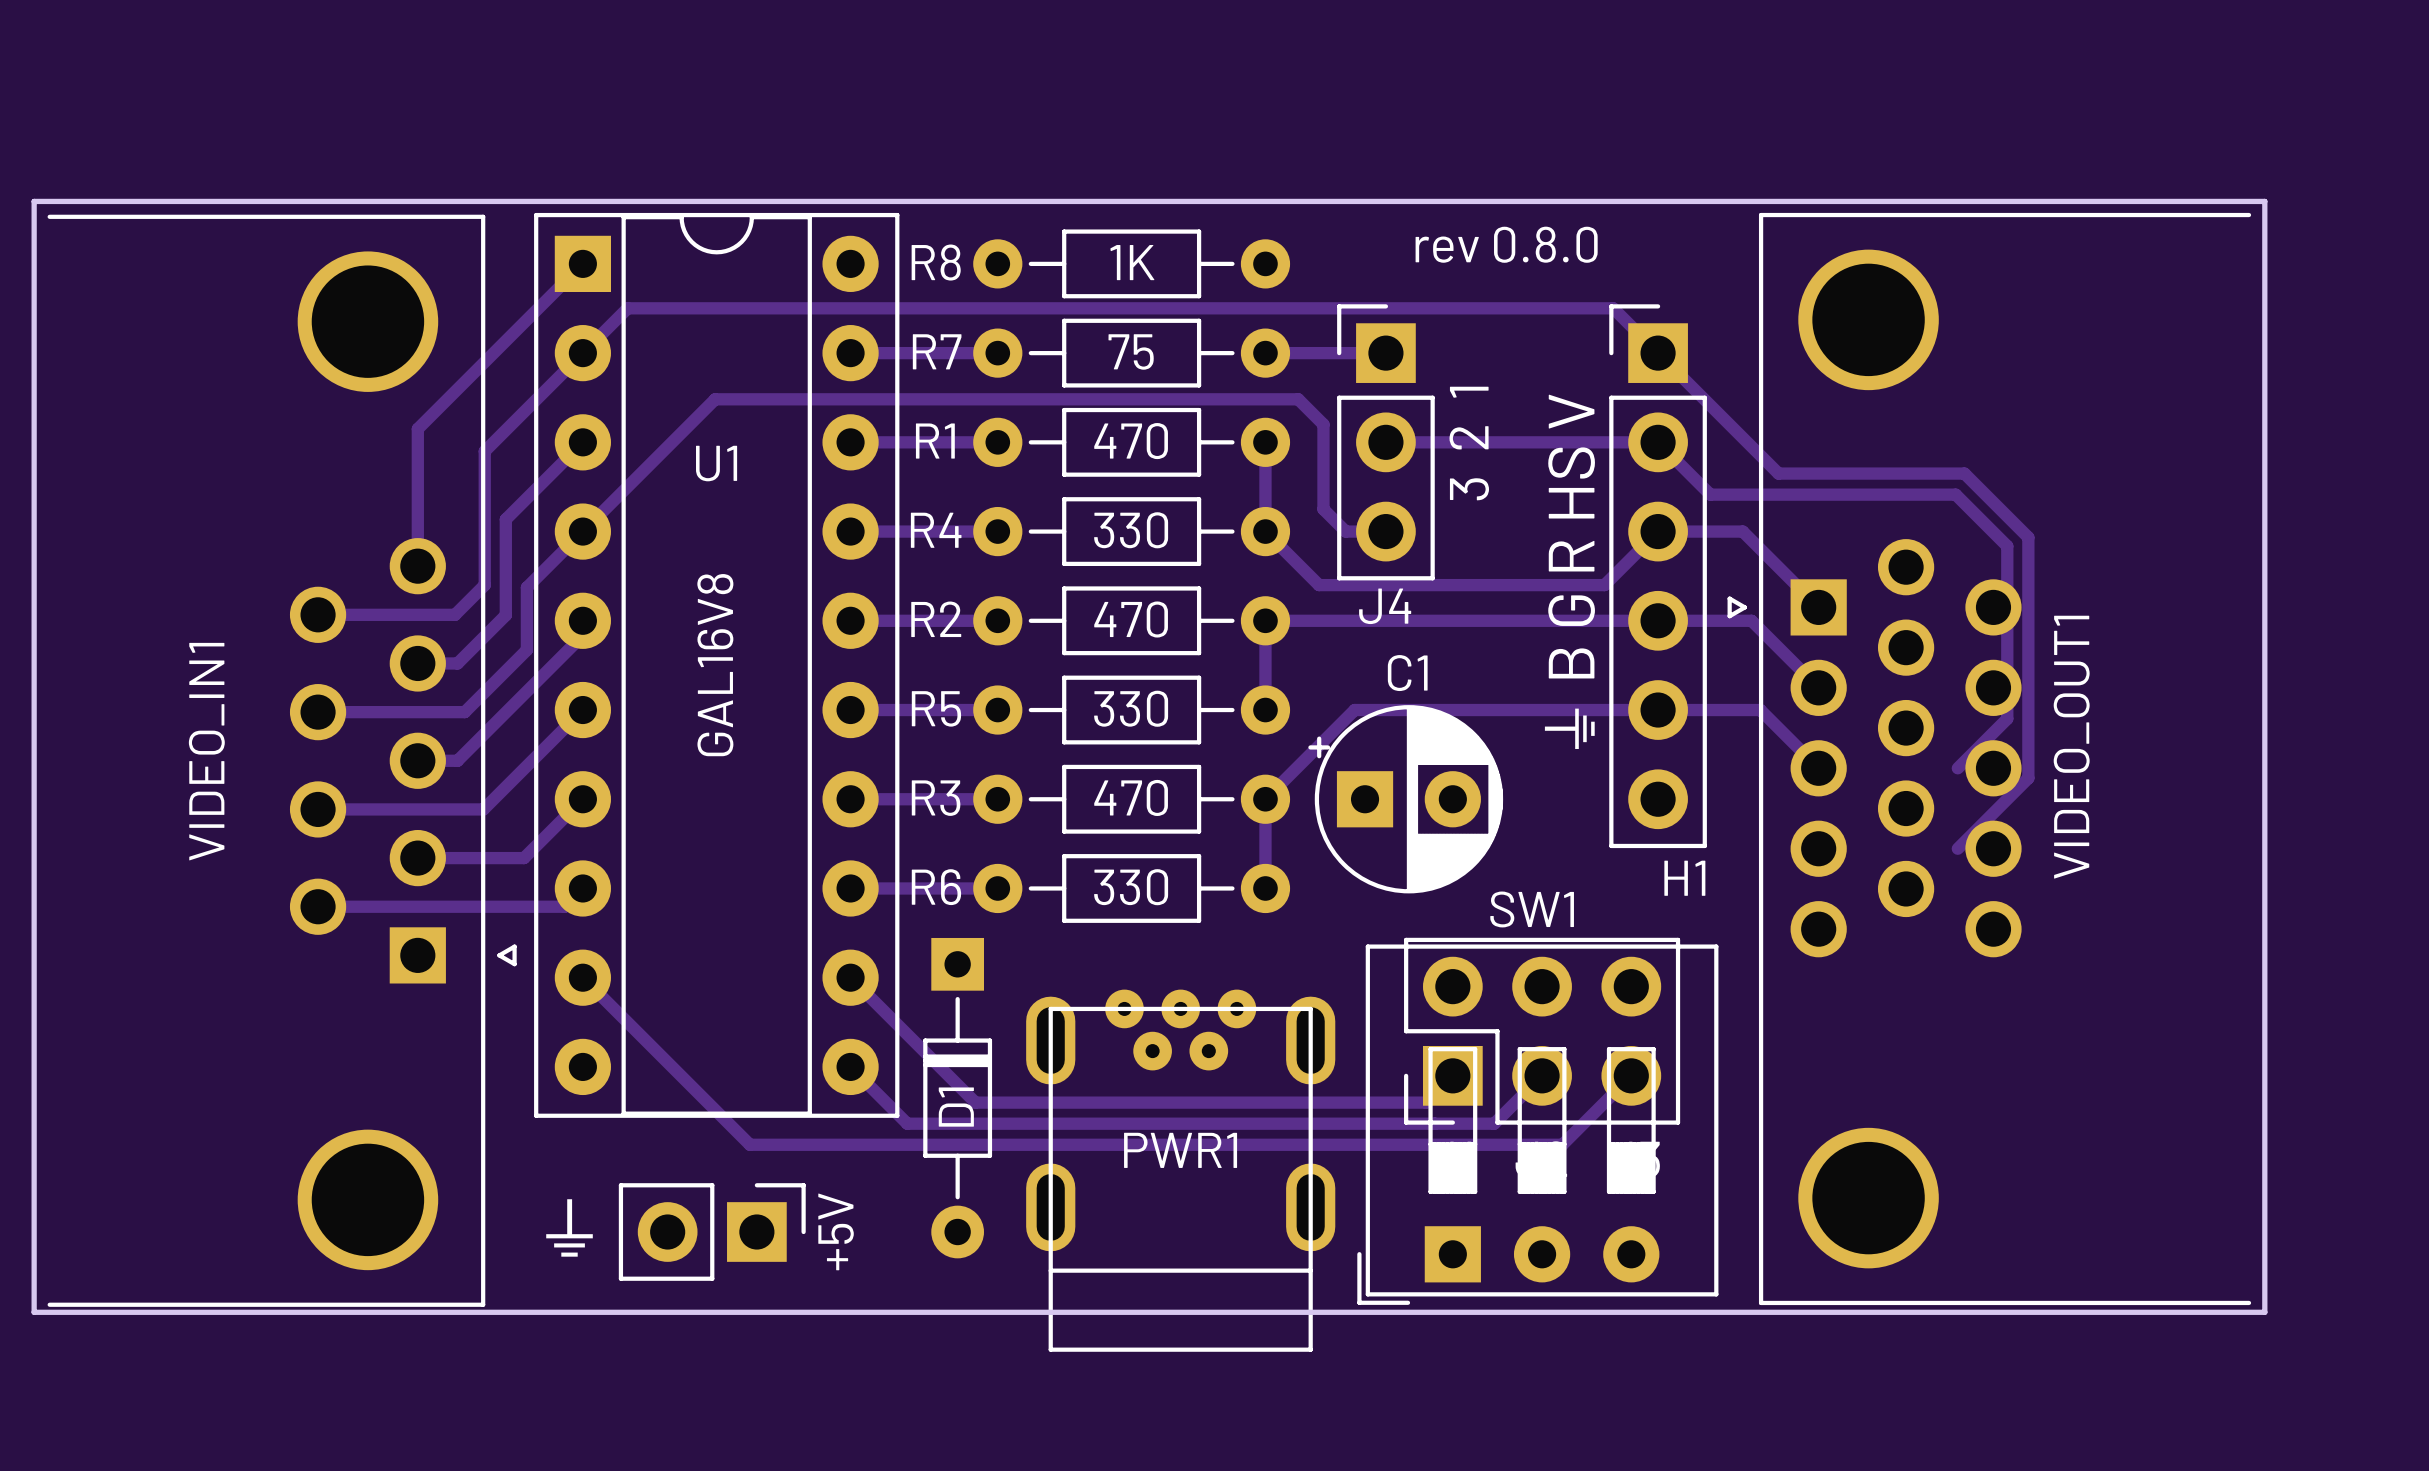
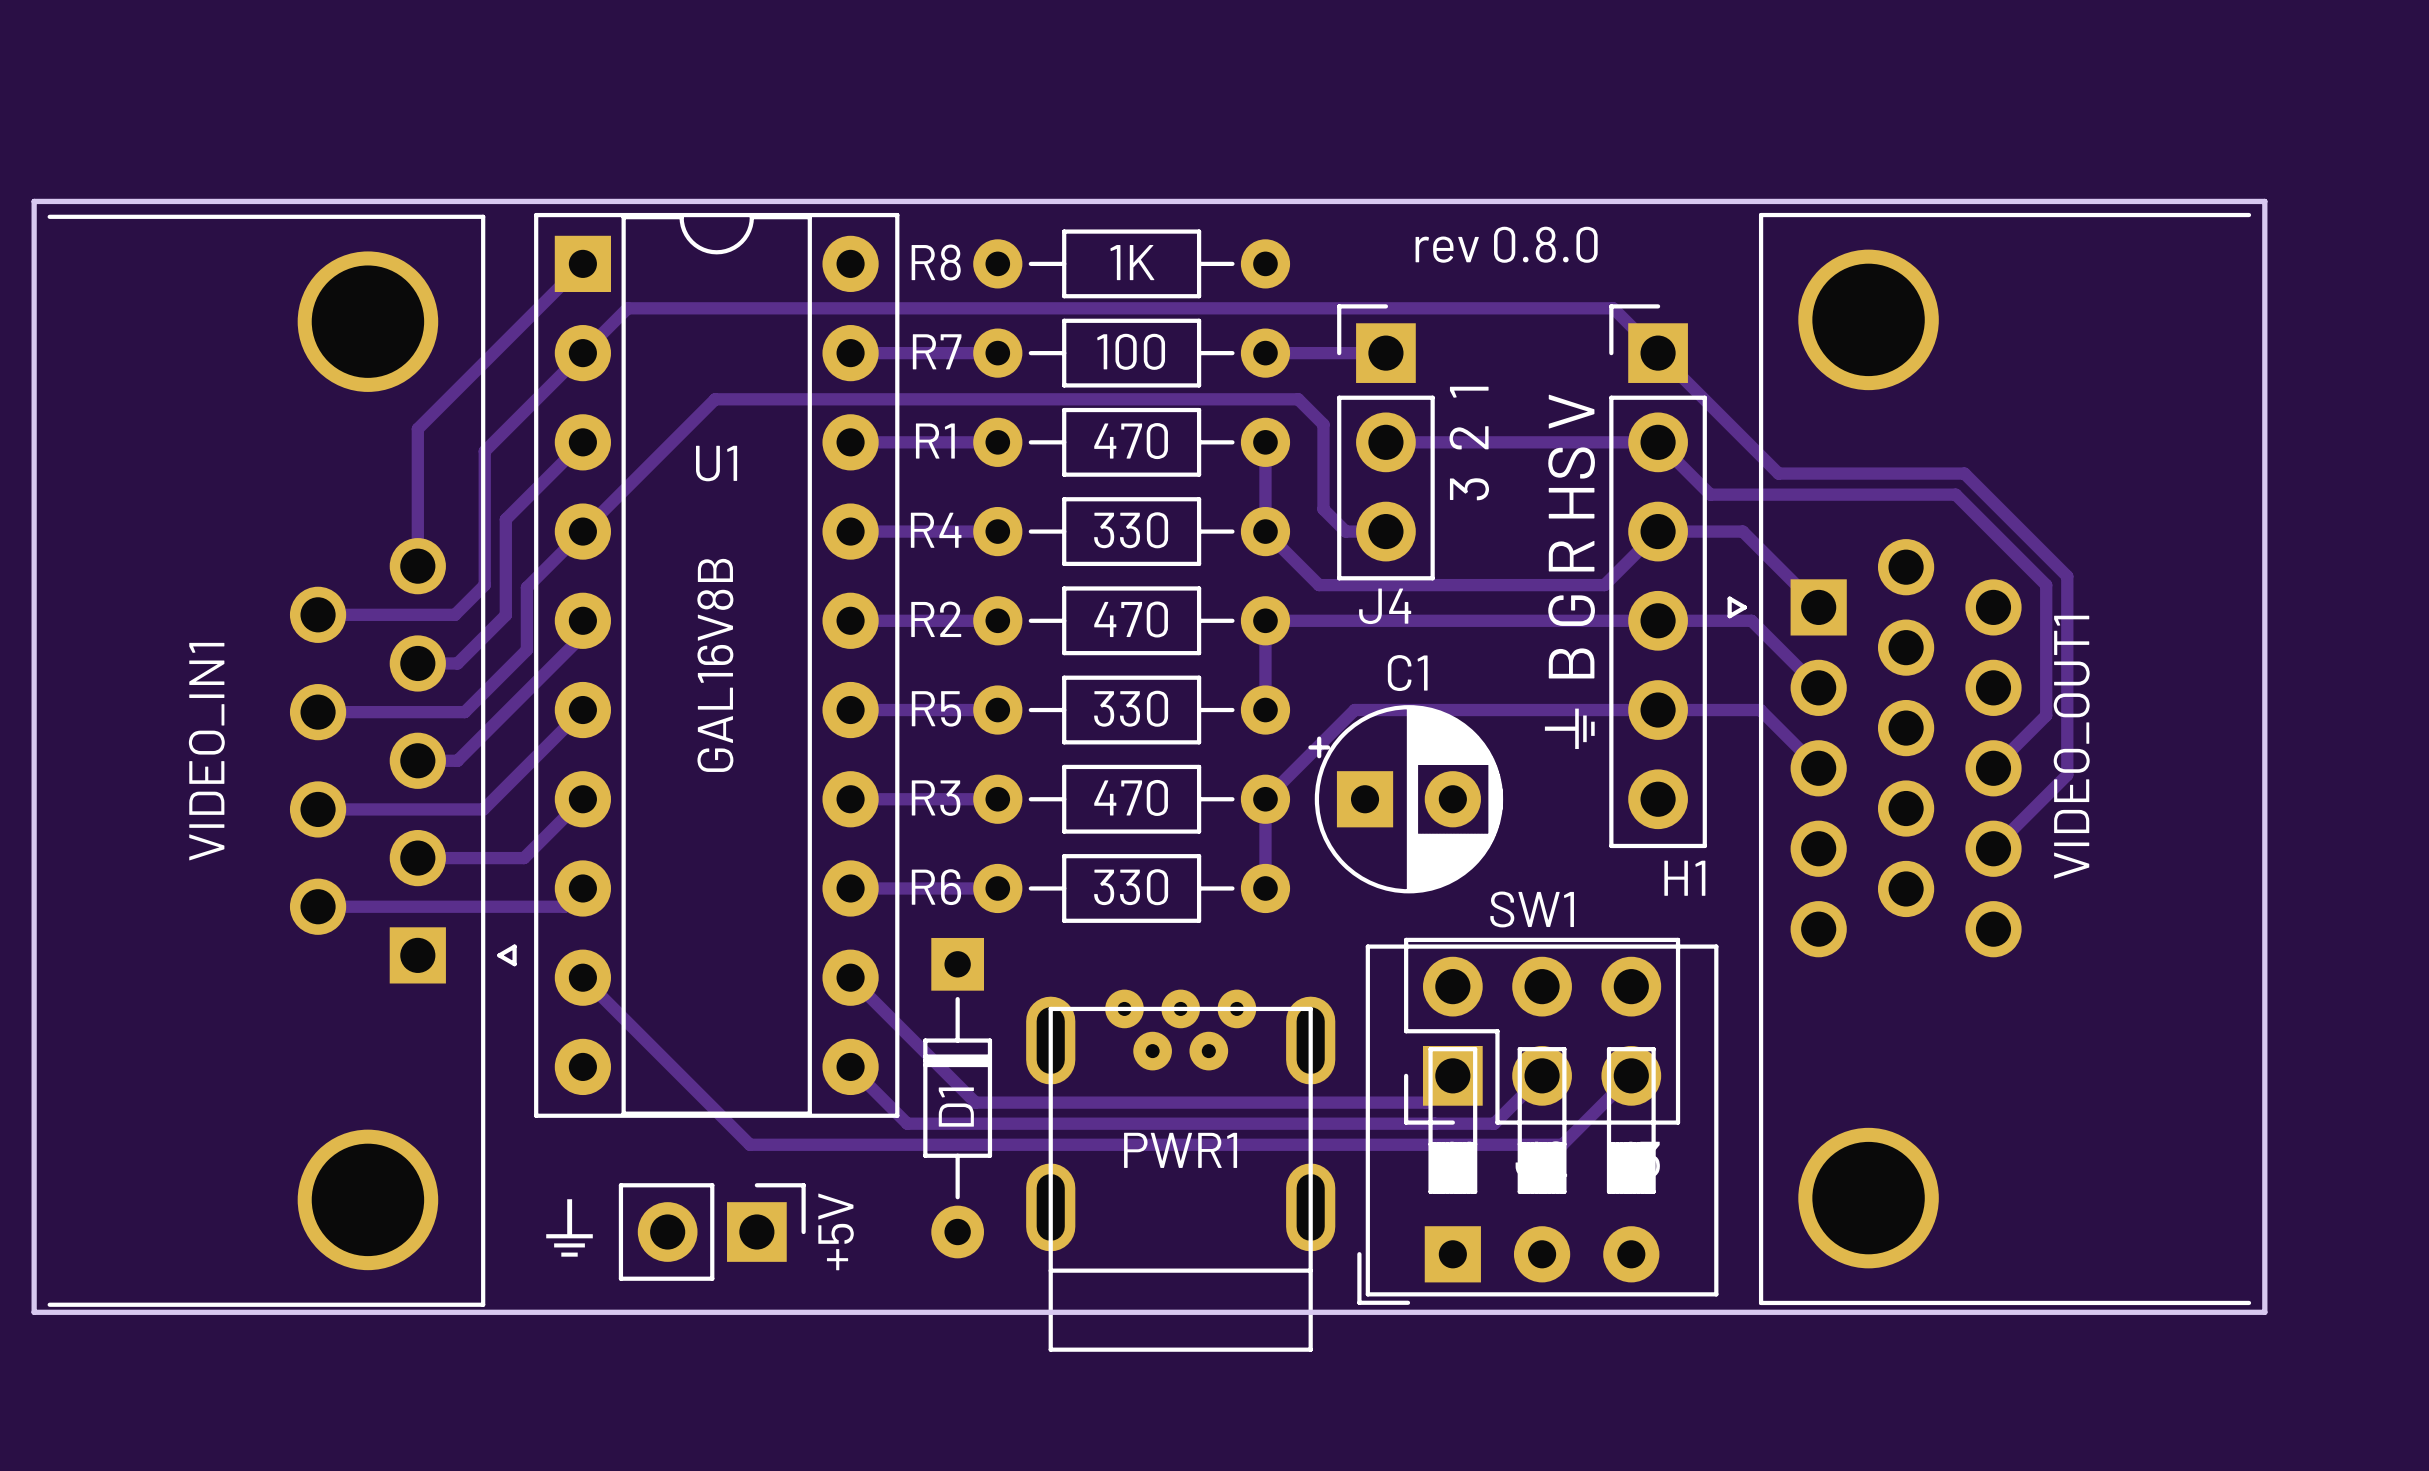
R7 value: 75 (1131, 351) -> 100 (1131, 351)
track: (2028, 537) (2028, 778) (1957, 848) -> (2028, 537) (2067, 576) (2067, 774) (1993, 848)
track: (2007, 546) (2007, 718) (1957, 768) -> (2007, 546) (2046, 585) (2046, 715) (1993, 768)
U1 value: GAL16V8 (715, 665) -> GAL16V8B (715, 665)

